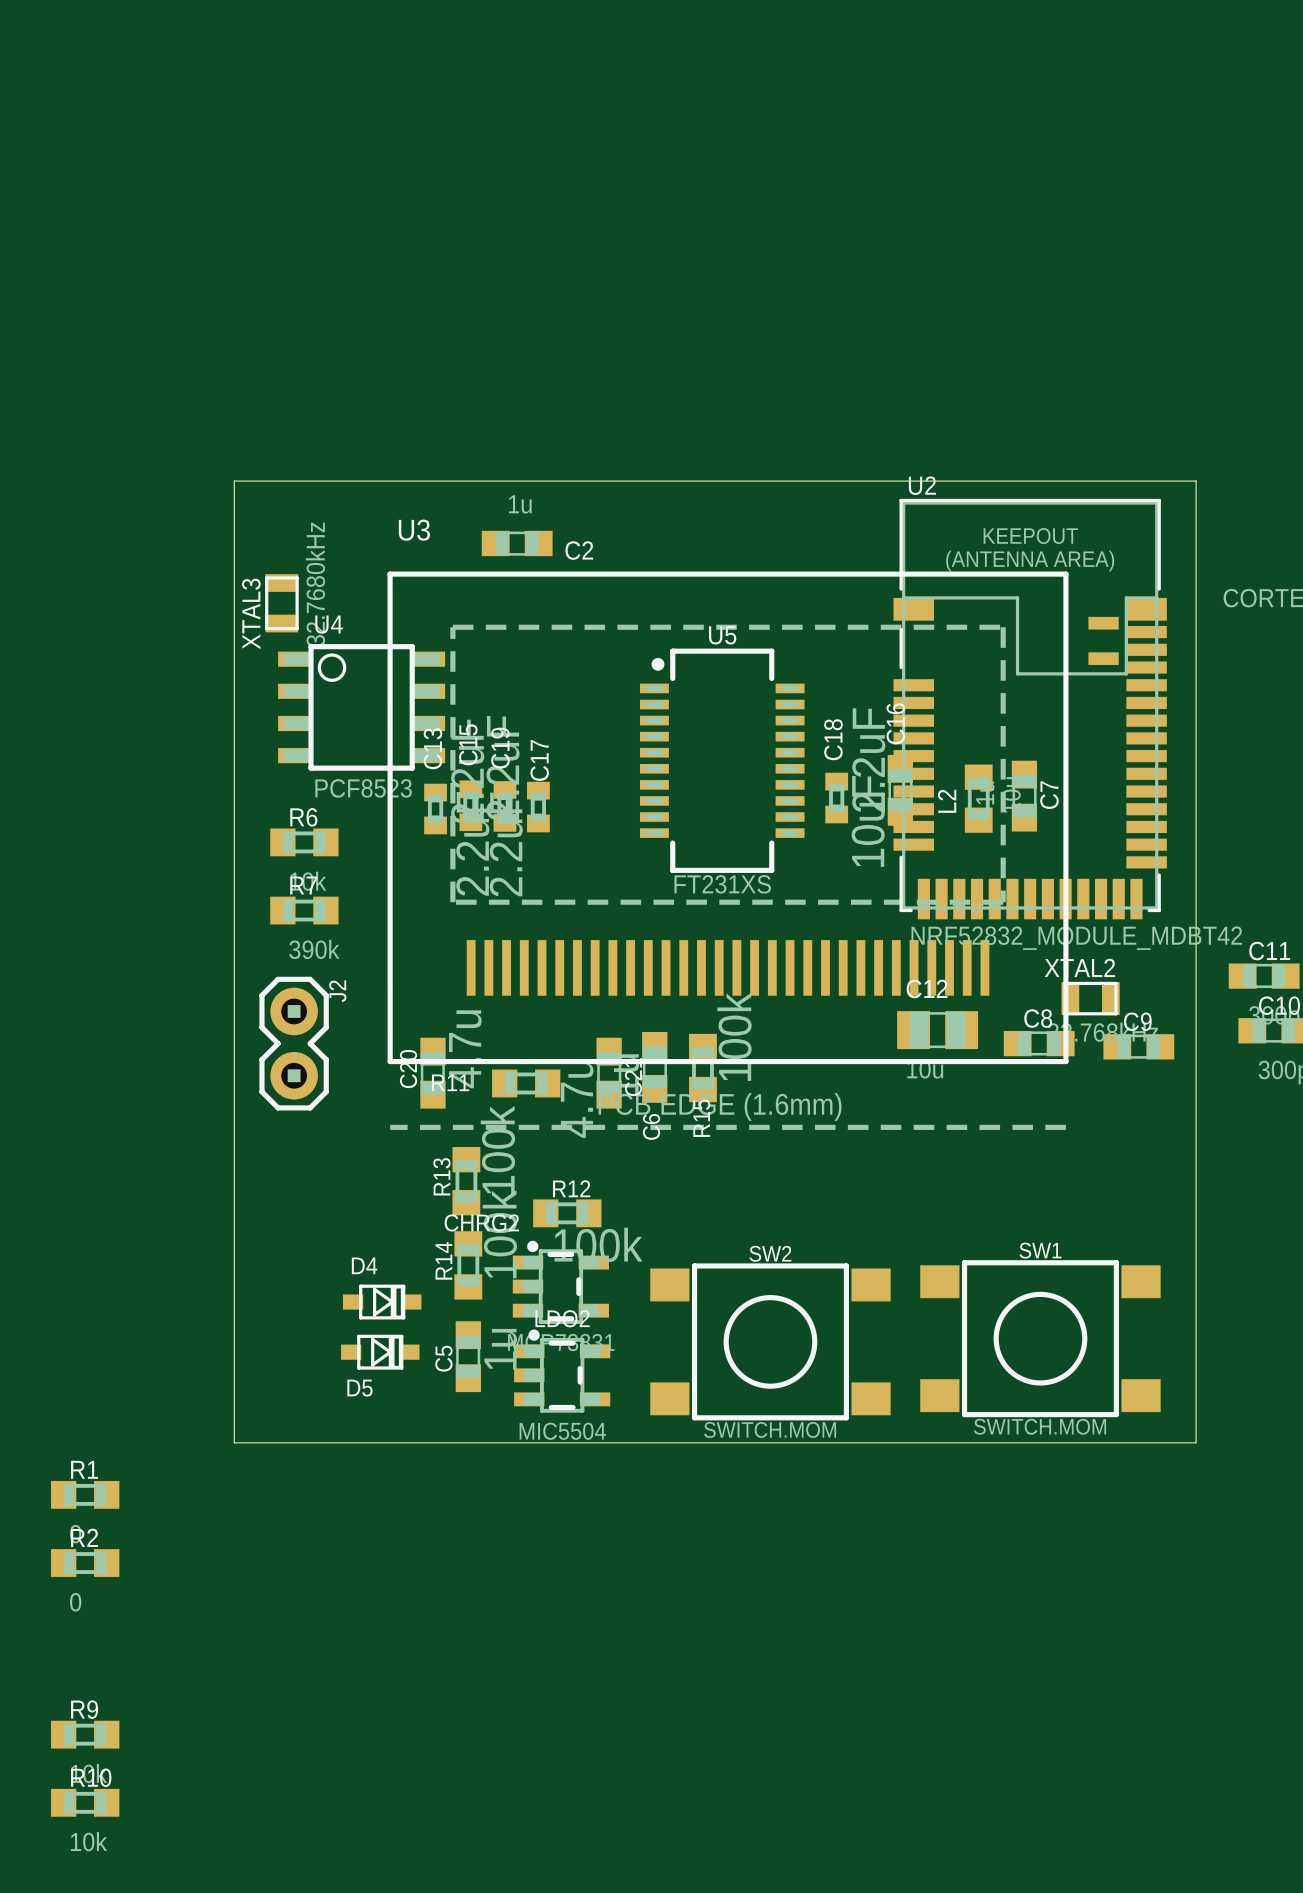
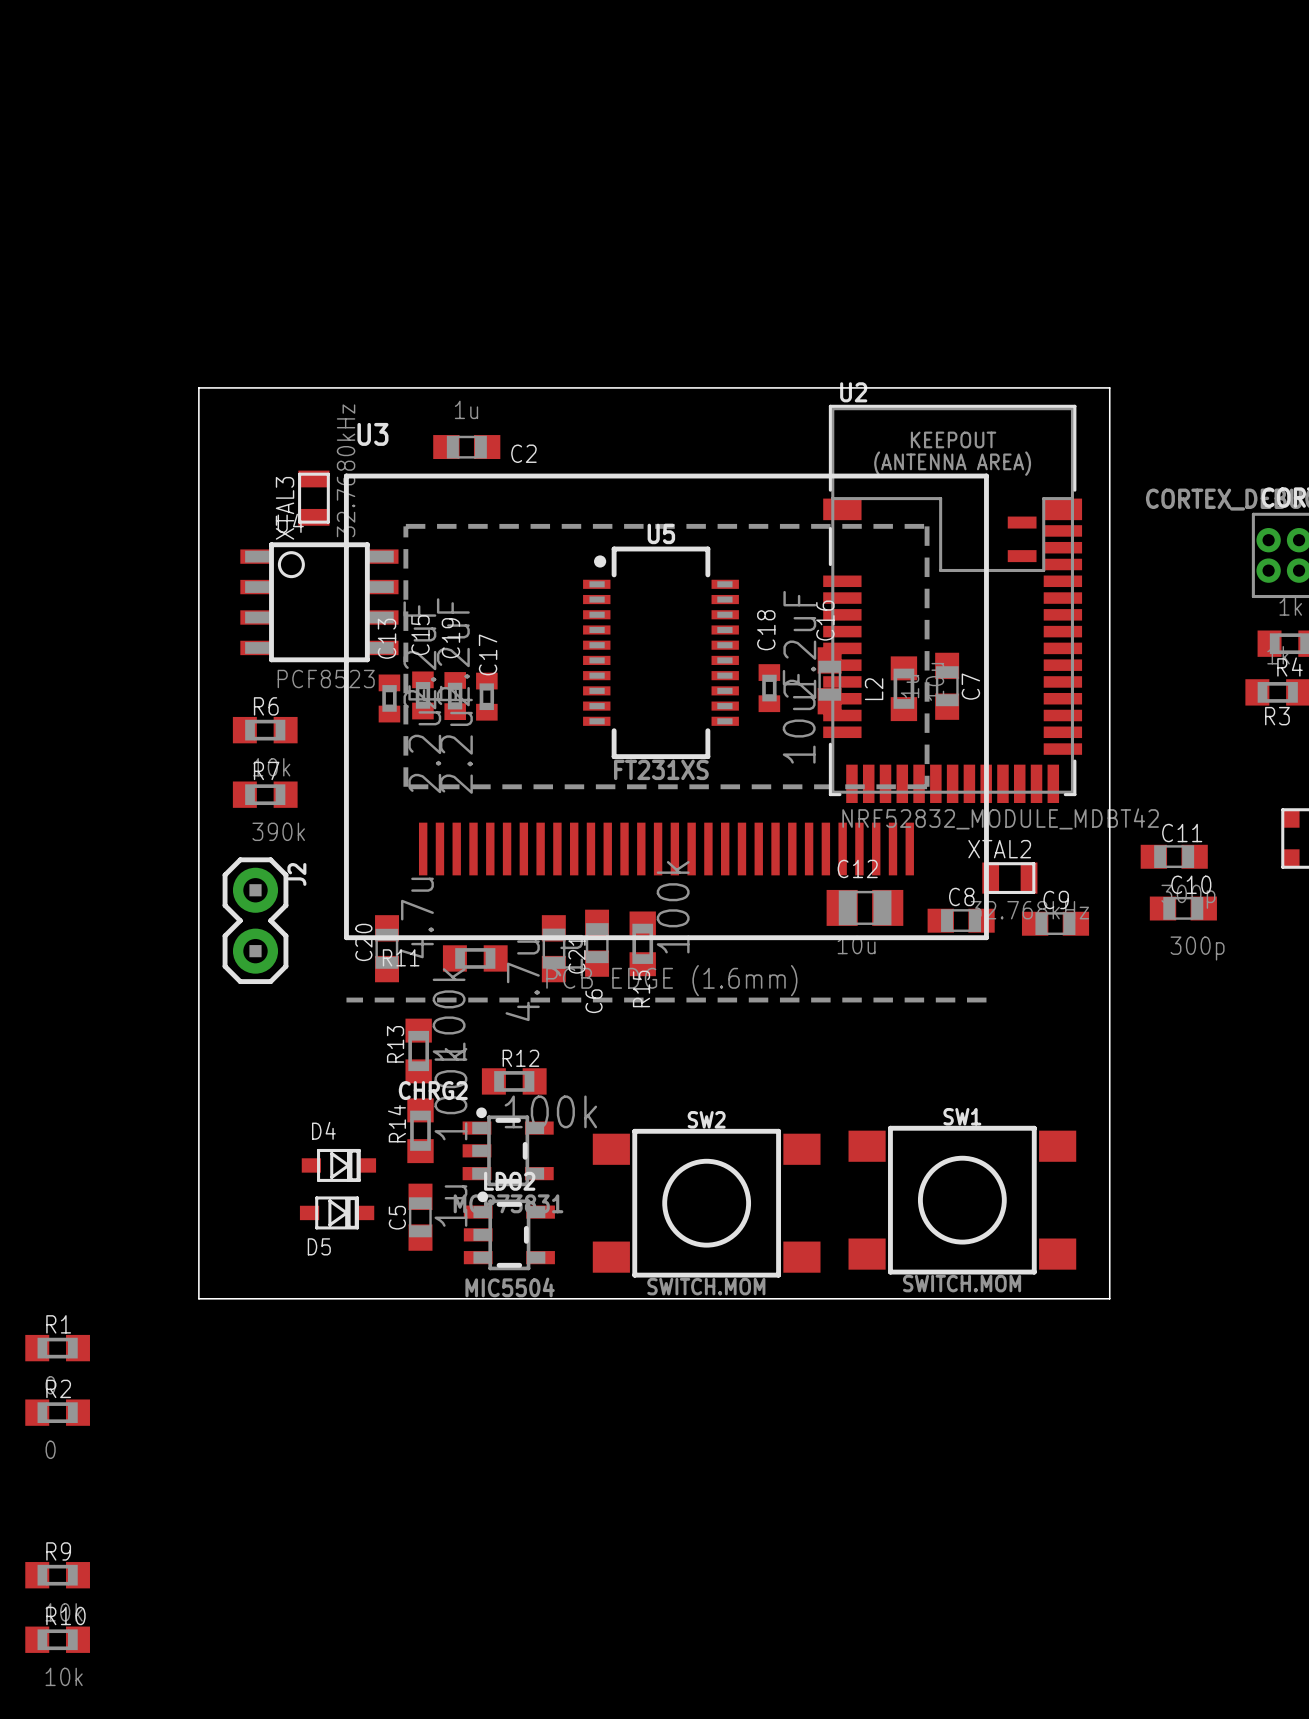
XTAL3 position: (281, 603) -> (313, 498)

